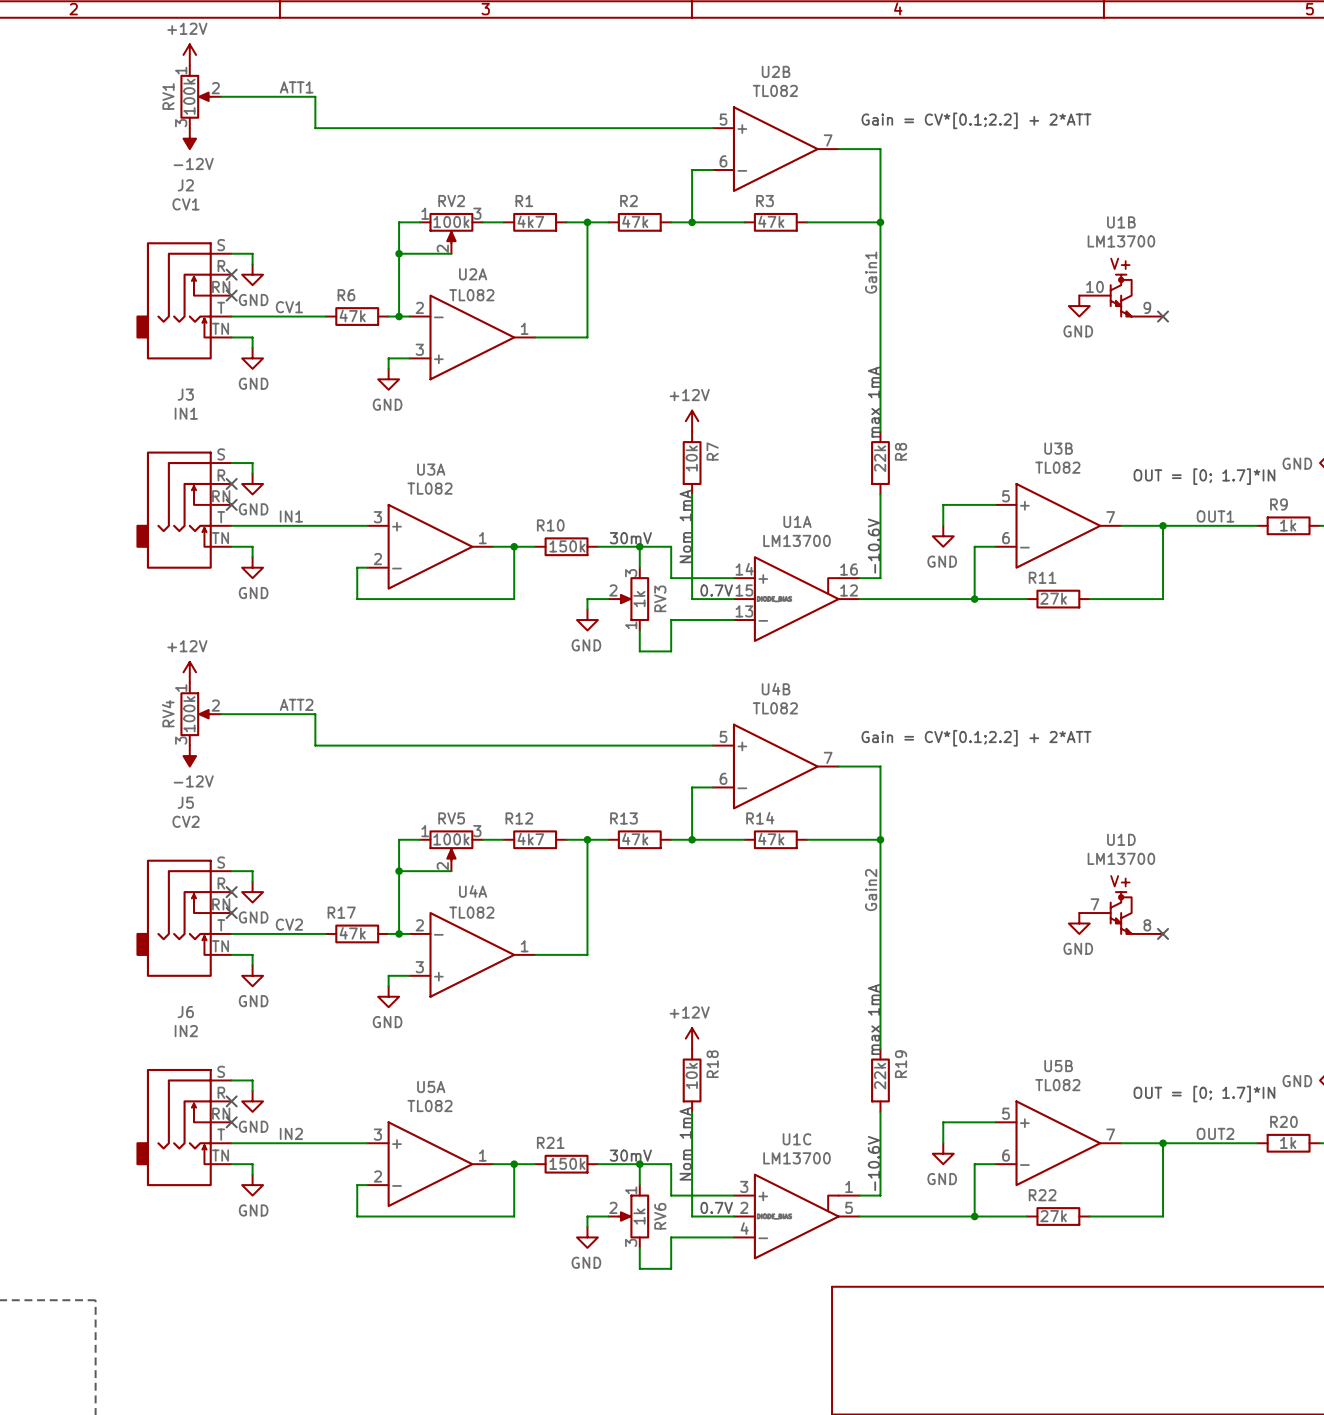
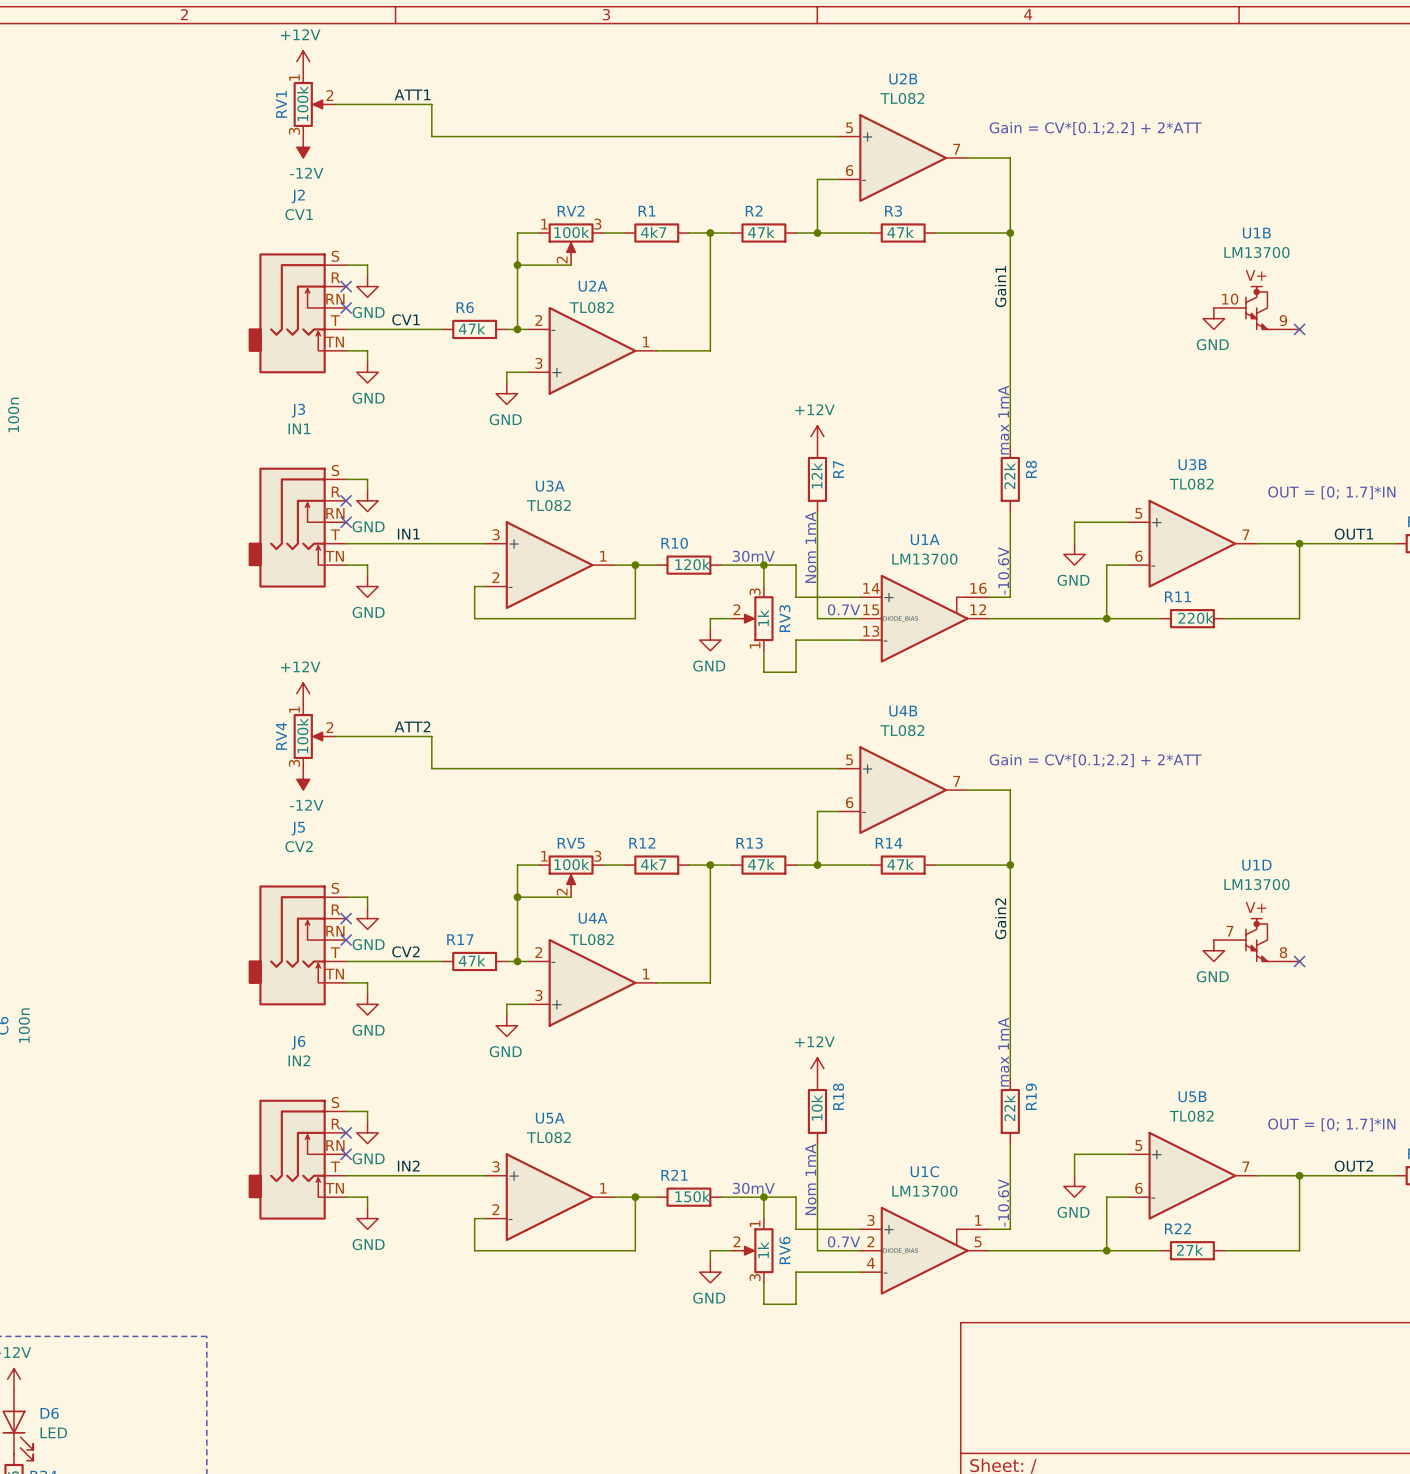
R7 value: 10k (691, 458) -> 12k (816, 475)
R10 value: 150k (567, 546) -> 120k (692, 564)
R11 value: 27k (1053, 598) -> 220k (1196, 618)

